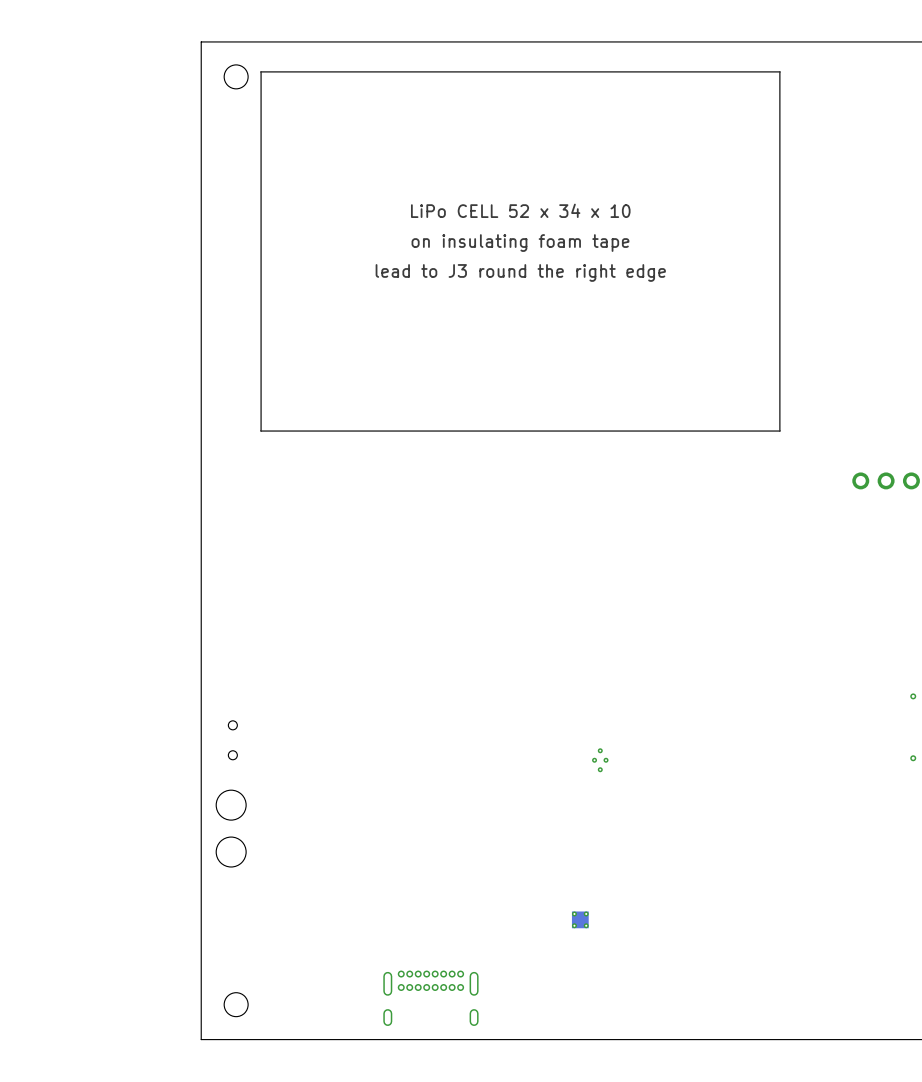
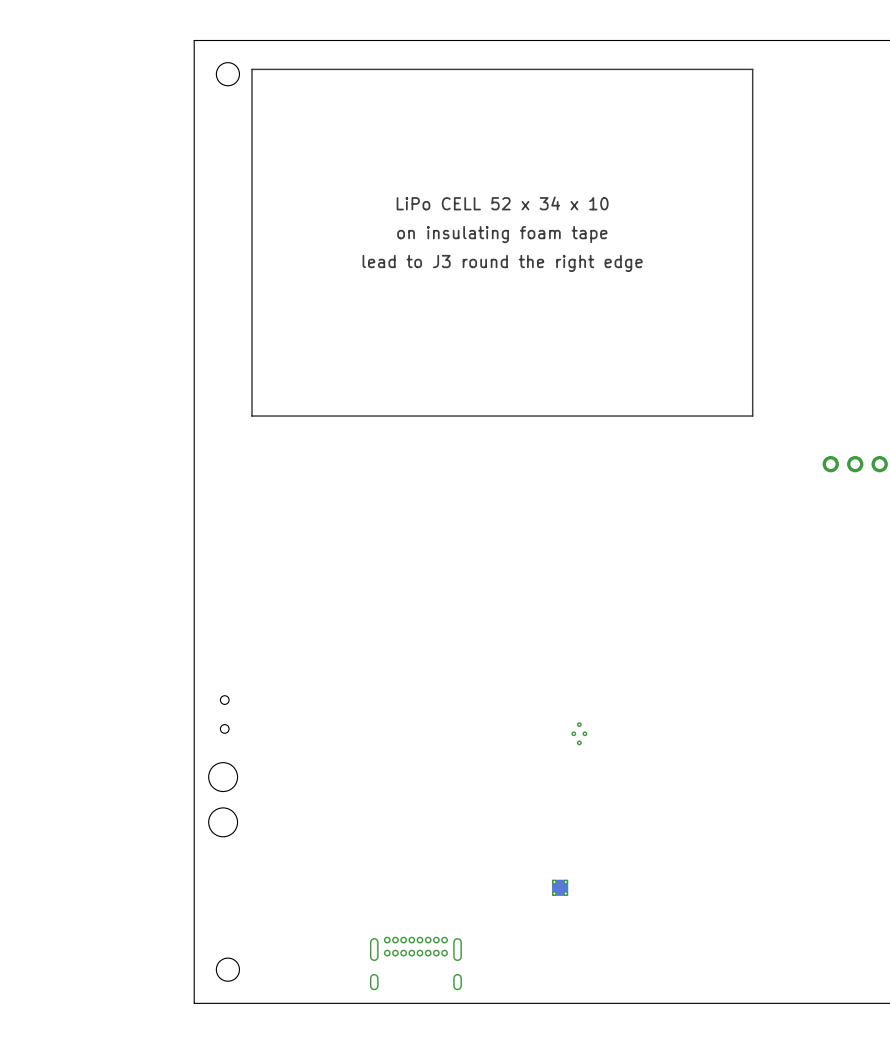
via: (913, 696) -> none
via: (913, 758) -> none

